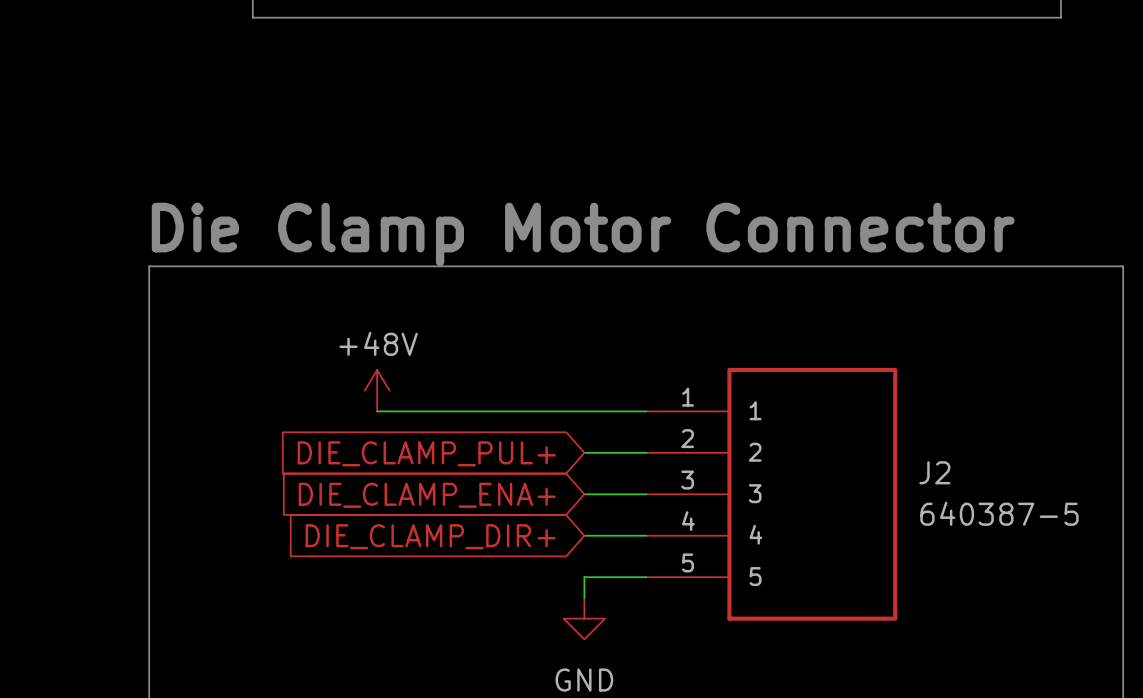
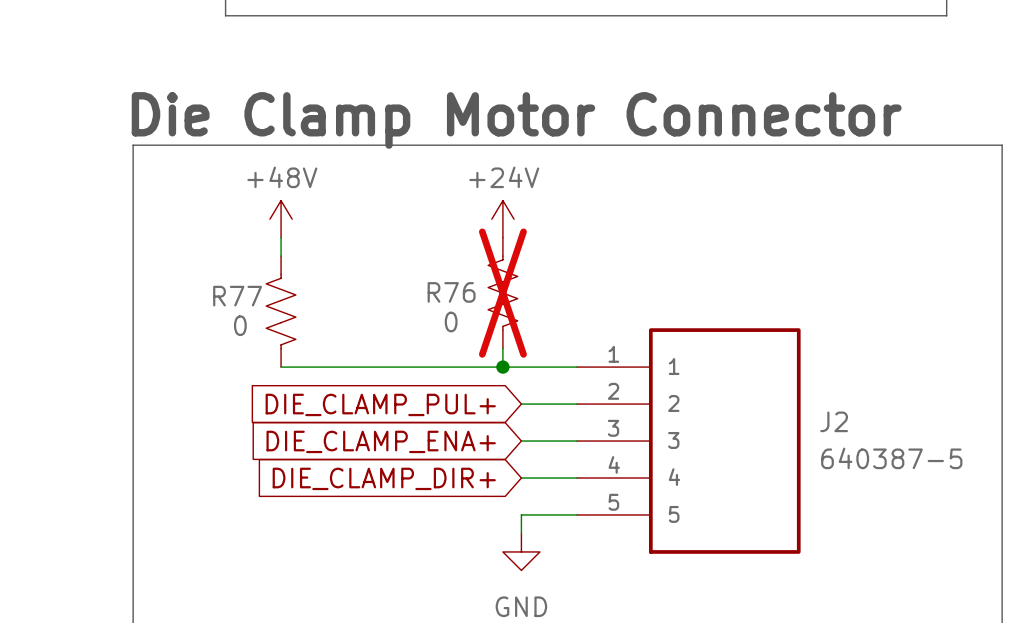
text position: Die Clamp Motor Connector (583, 234) -> Die Clamp Motor Connector (516, 120)
power symbol: none -> +24V (502, 219)
line: (149, 266) (1123, 266) -> (133, 237) (133, 145) (1002, 145) (1002, 237)
wire: none -> (281, 237) (281, 256)
R76: none -> 0 (502, 293)
R77: none -> 0 (281, 311)
power symbol position: +48V (377, 390) -> +48V (281, 219)
wire: none -> (502, 348) (502, 367)
wire: none -> (281, 367) (336, 367)
junction: none -> (502, 367)

